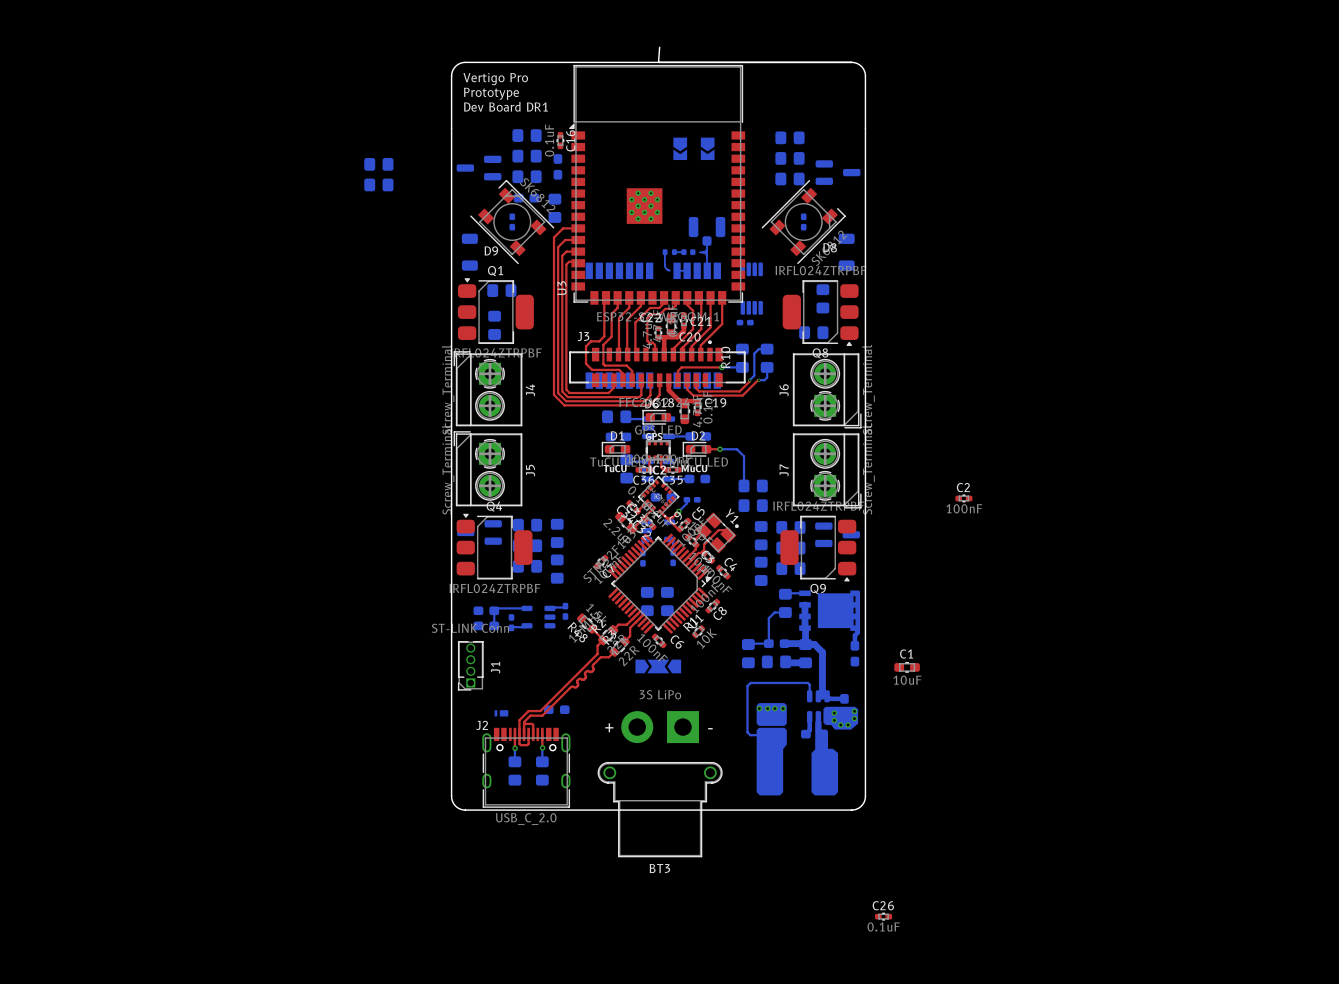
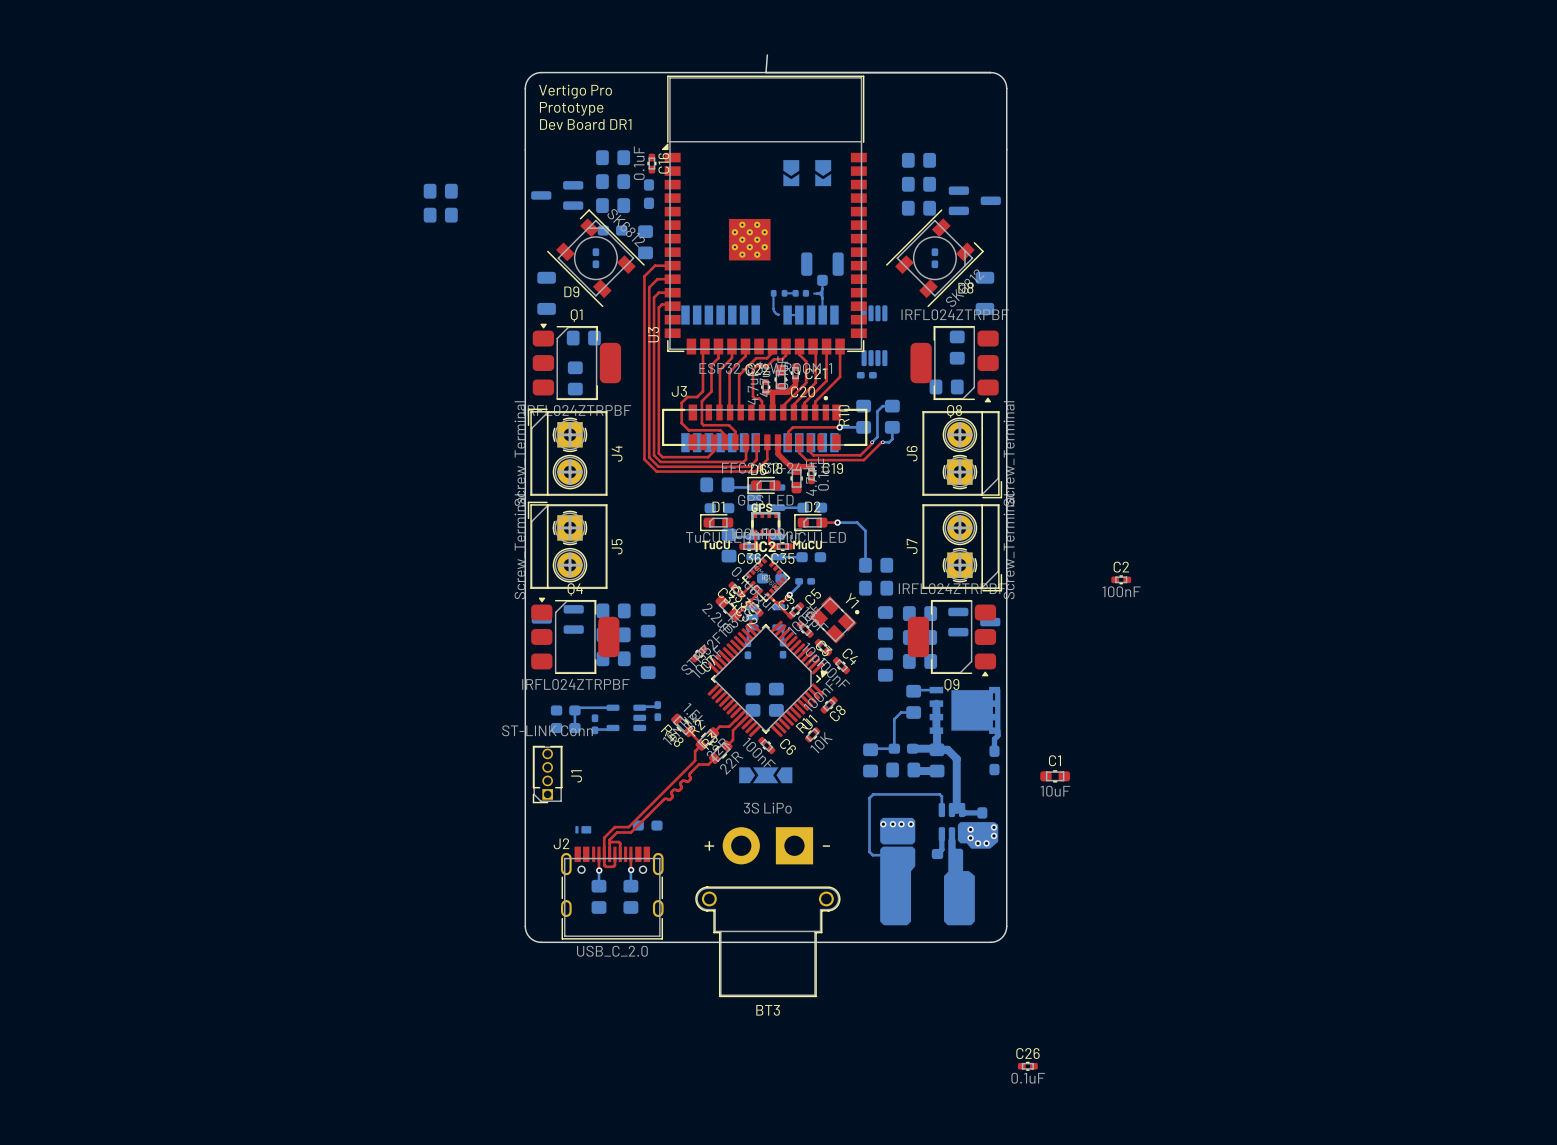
top track: (703, 530) (695, 538) (695, 549) (686, 558) -> none
top track: (728, 534) (723, 530) (718, 530) (704, 544) (704, 552) (698, 552) (690, 561) -> none

